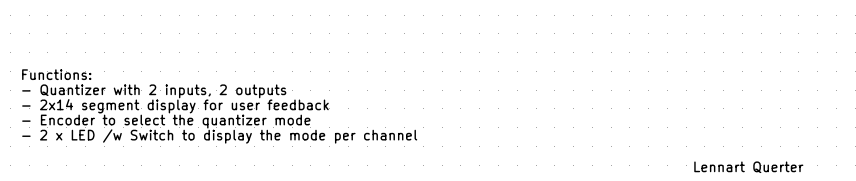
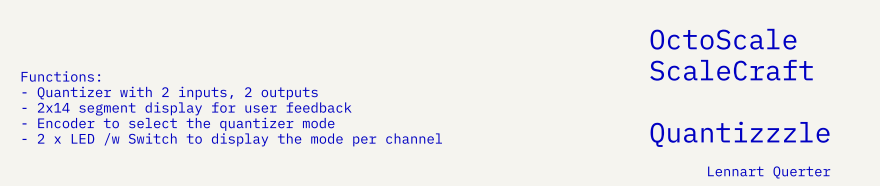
text: none -> OctoScale (723, 39)
text: none -> ScaleCraft (731, 70)
text: none -> Quantizzzle (740, 134)

